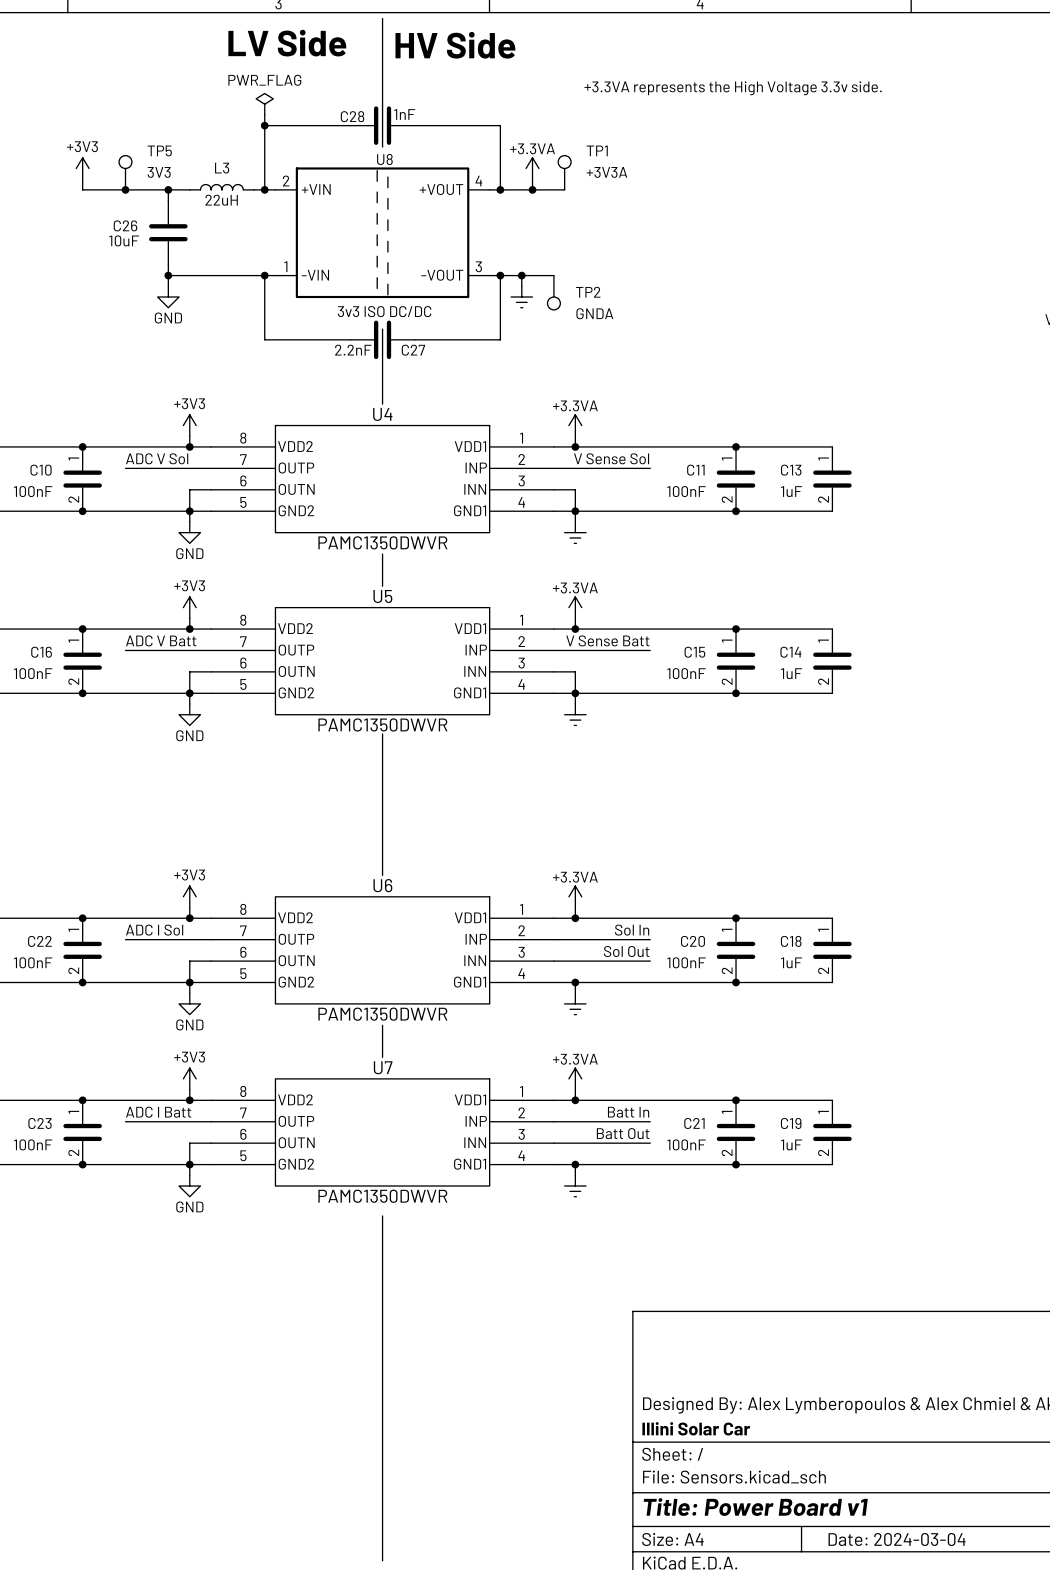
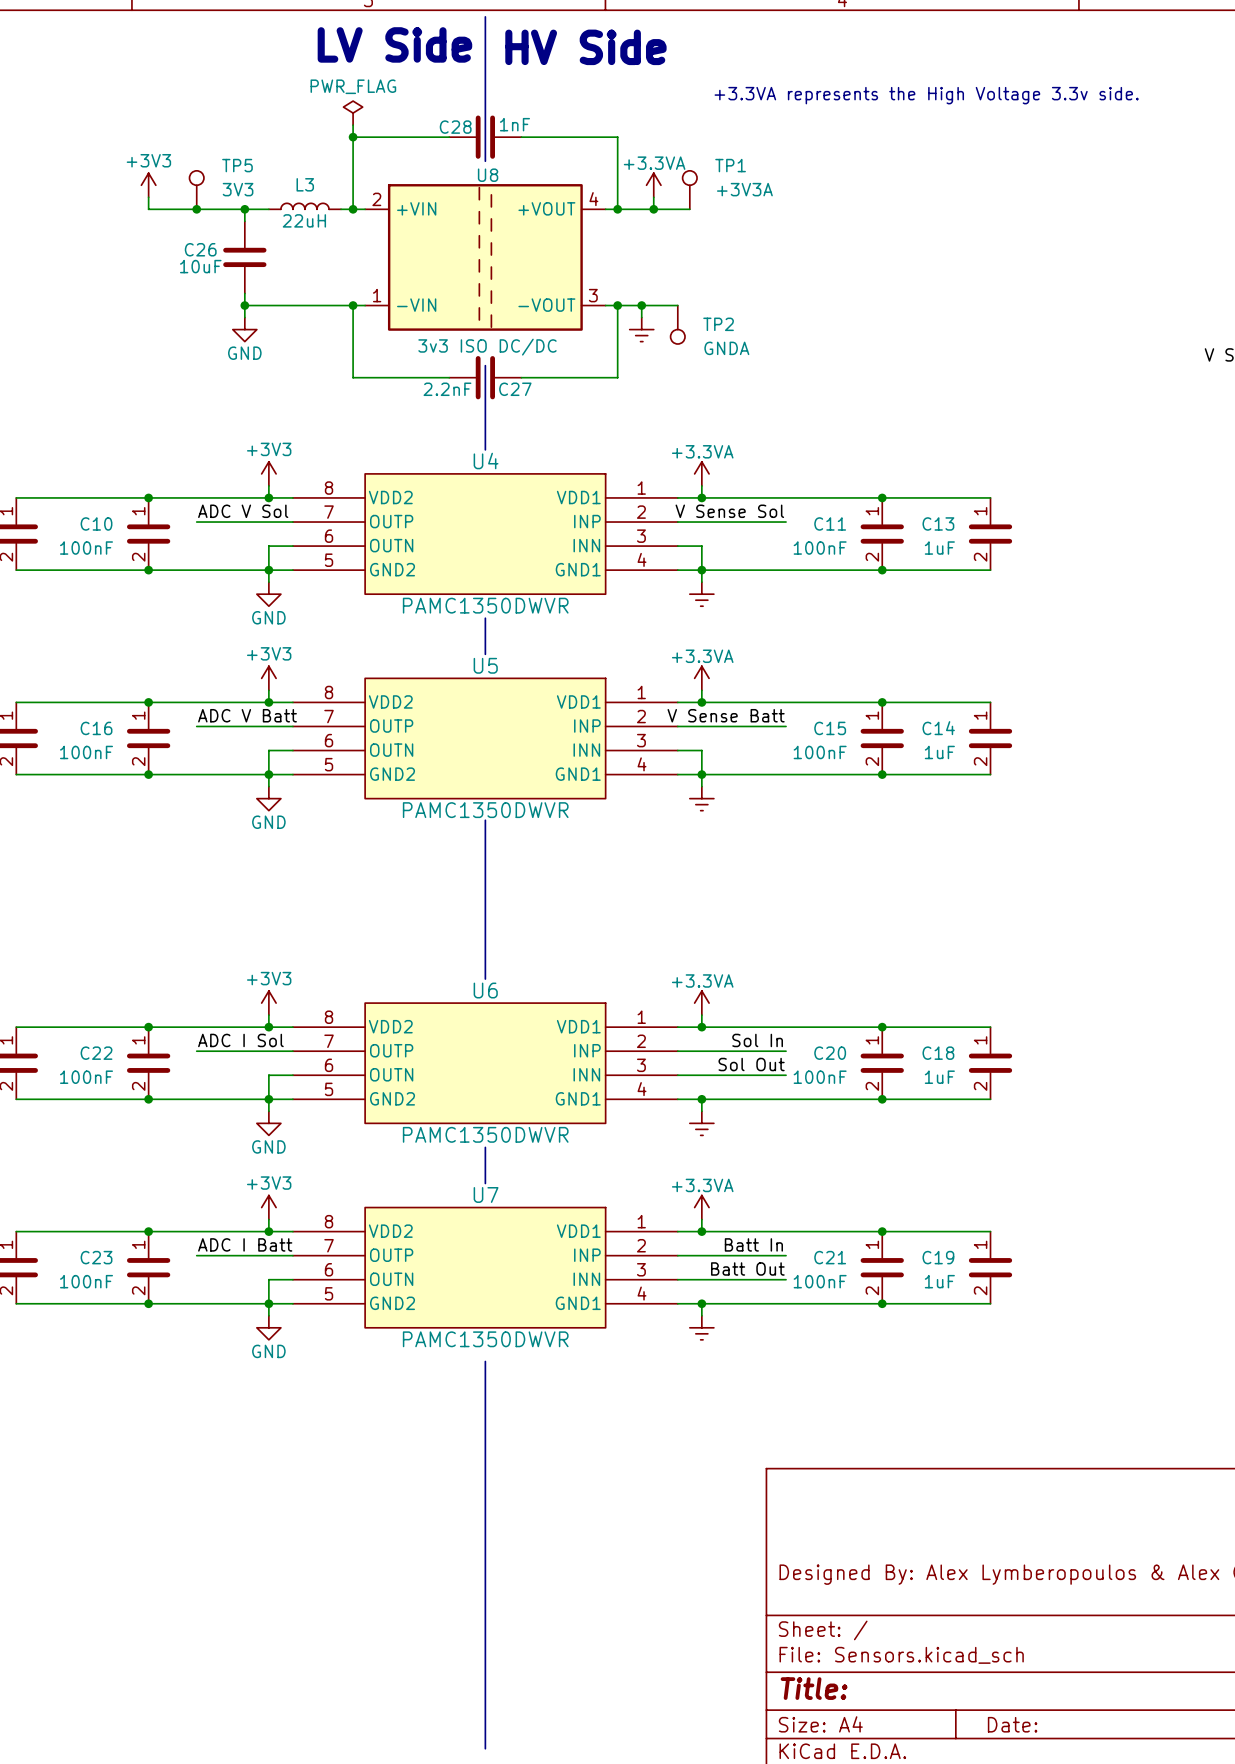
title block: Illini Solar Car (696, 1428) -> none
title block: Title: Power Board v1 (755, 1507) -> Title: (814, 1688)
title block: Date: 2024-03-04 (897, 1539) -> Date: (1012, 1724)

